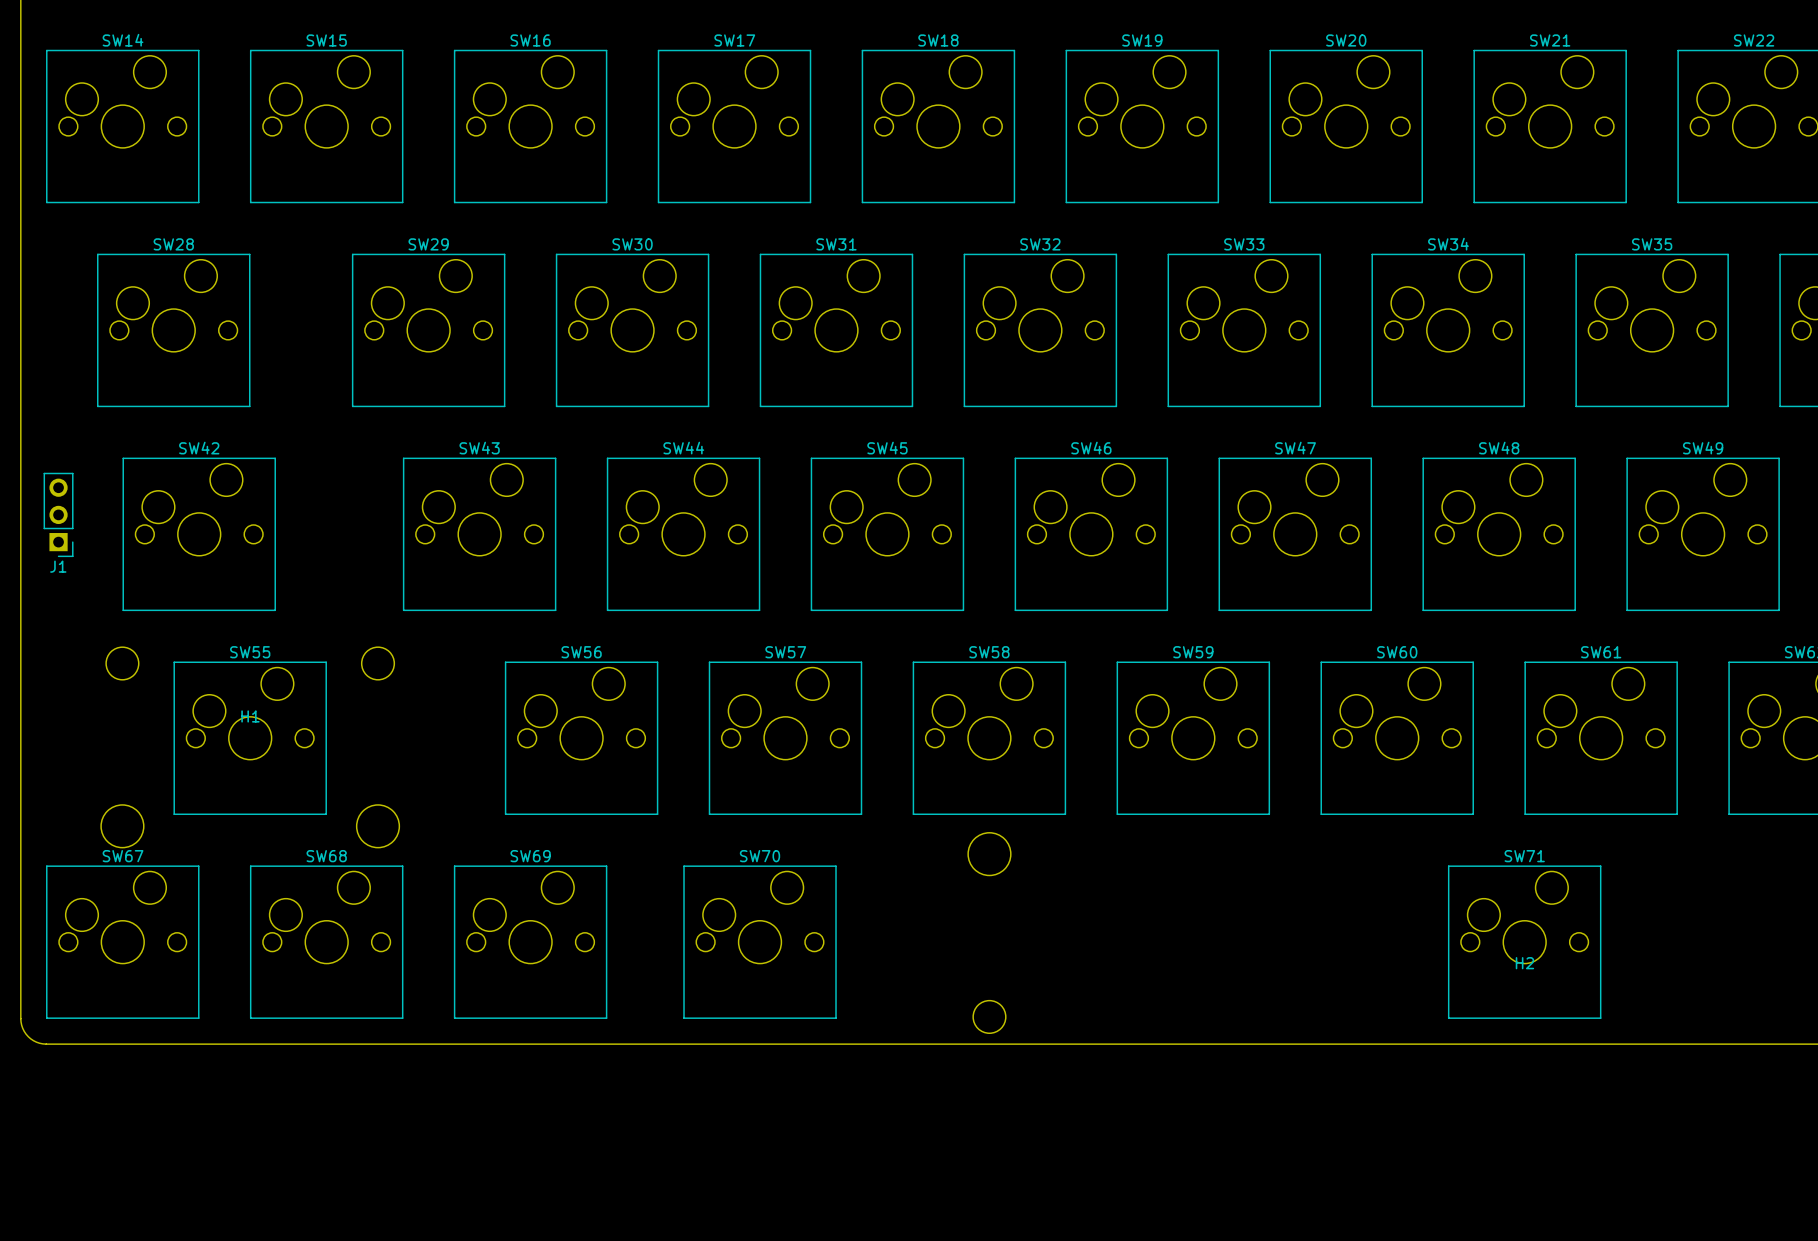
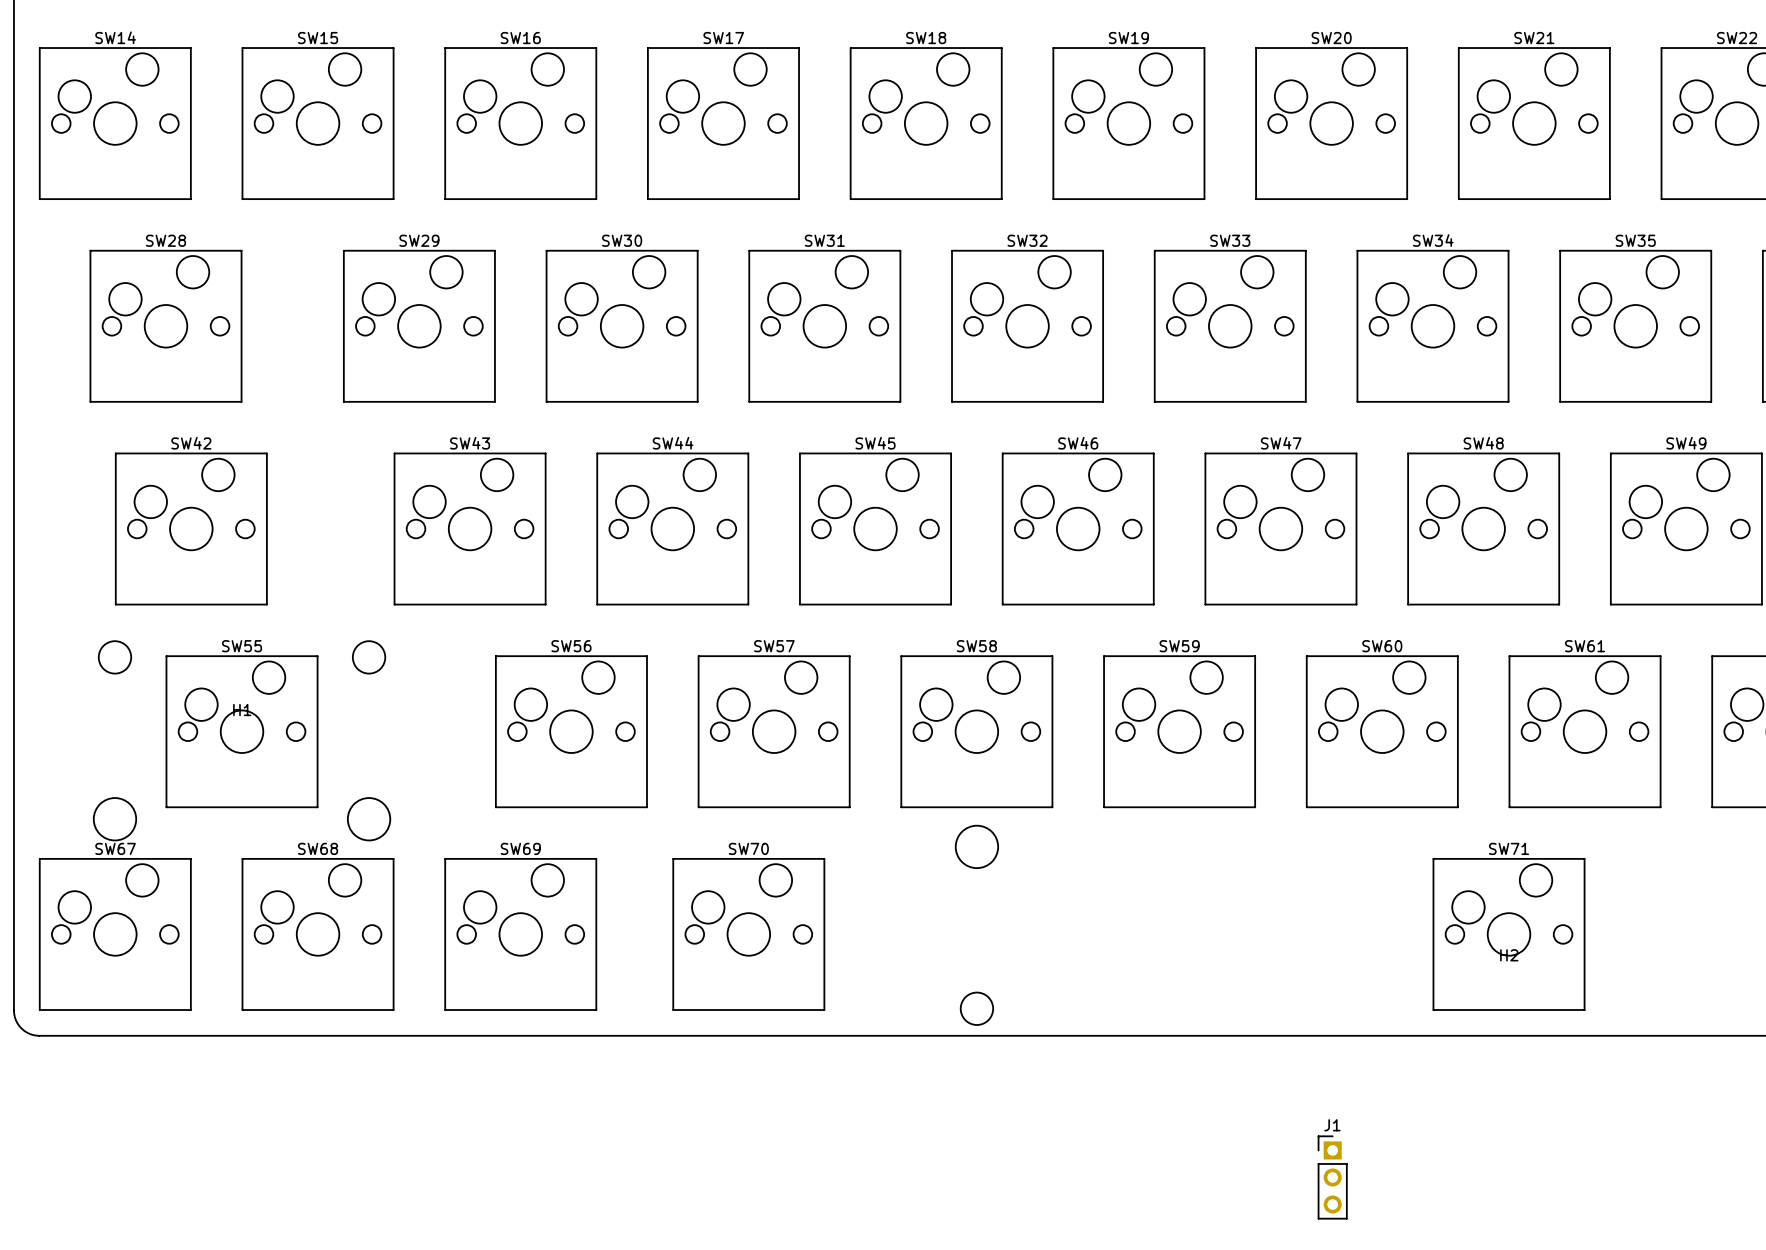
J1 rotation: 0° (58, 514) -> 180° (1332, 1177)
J1 position: (58, 514) -> (1332, 1177)

